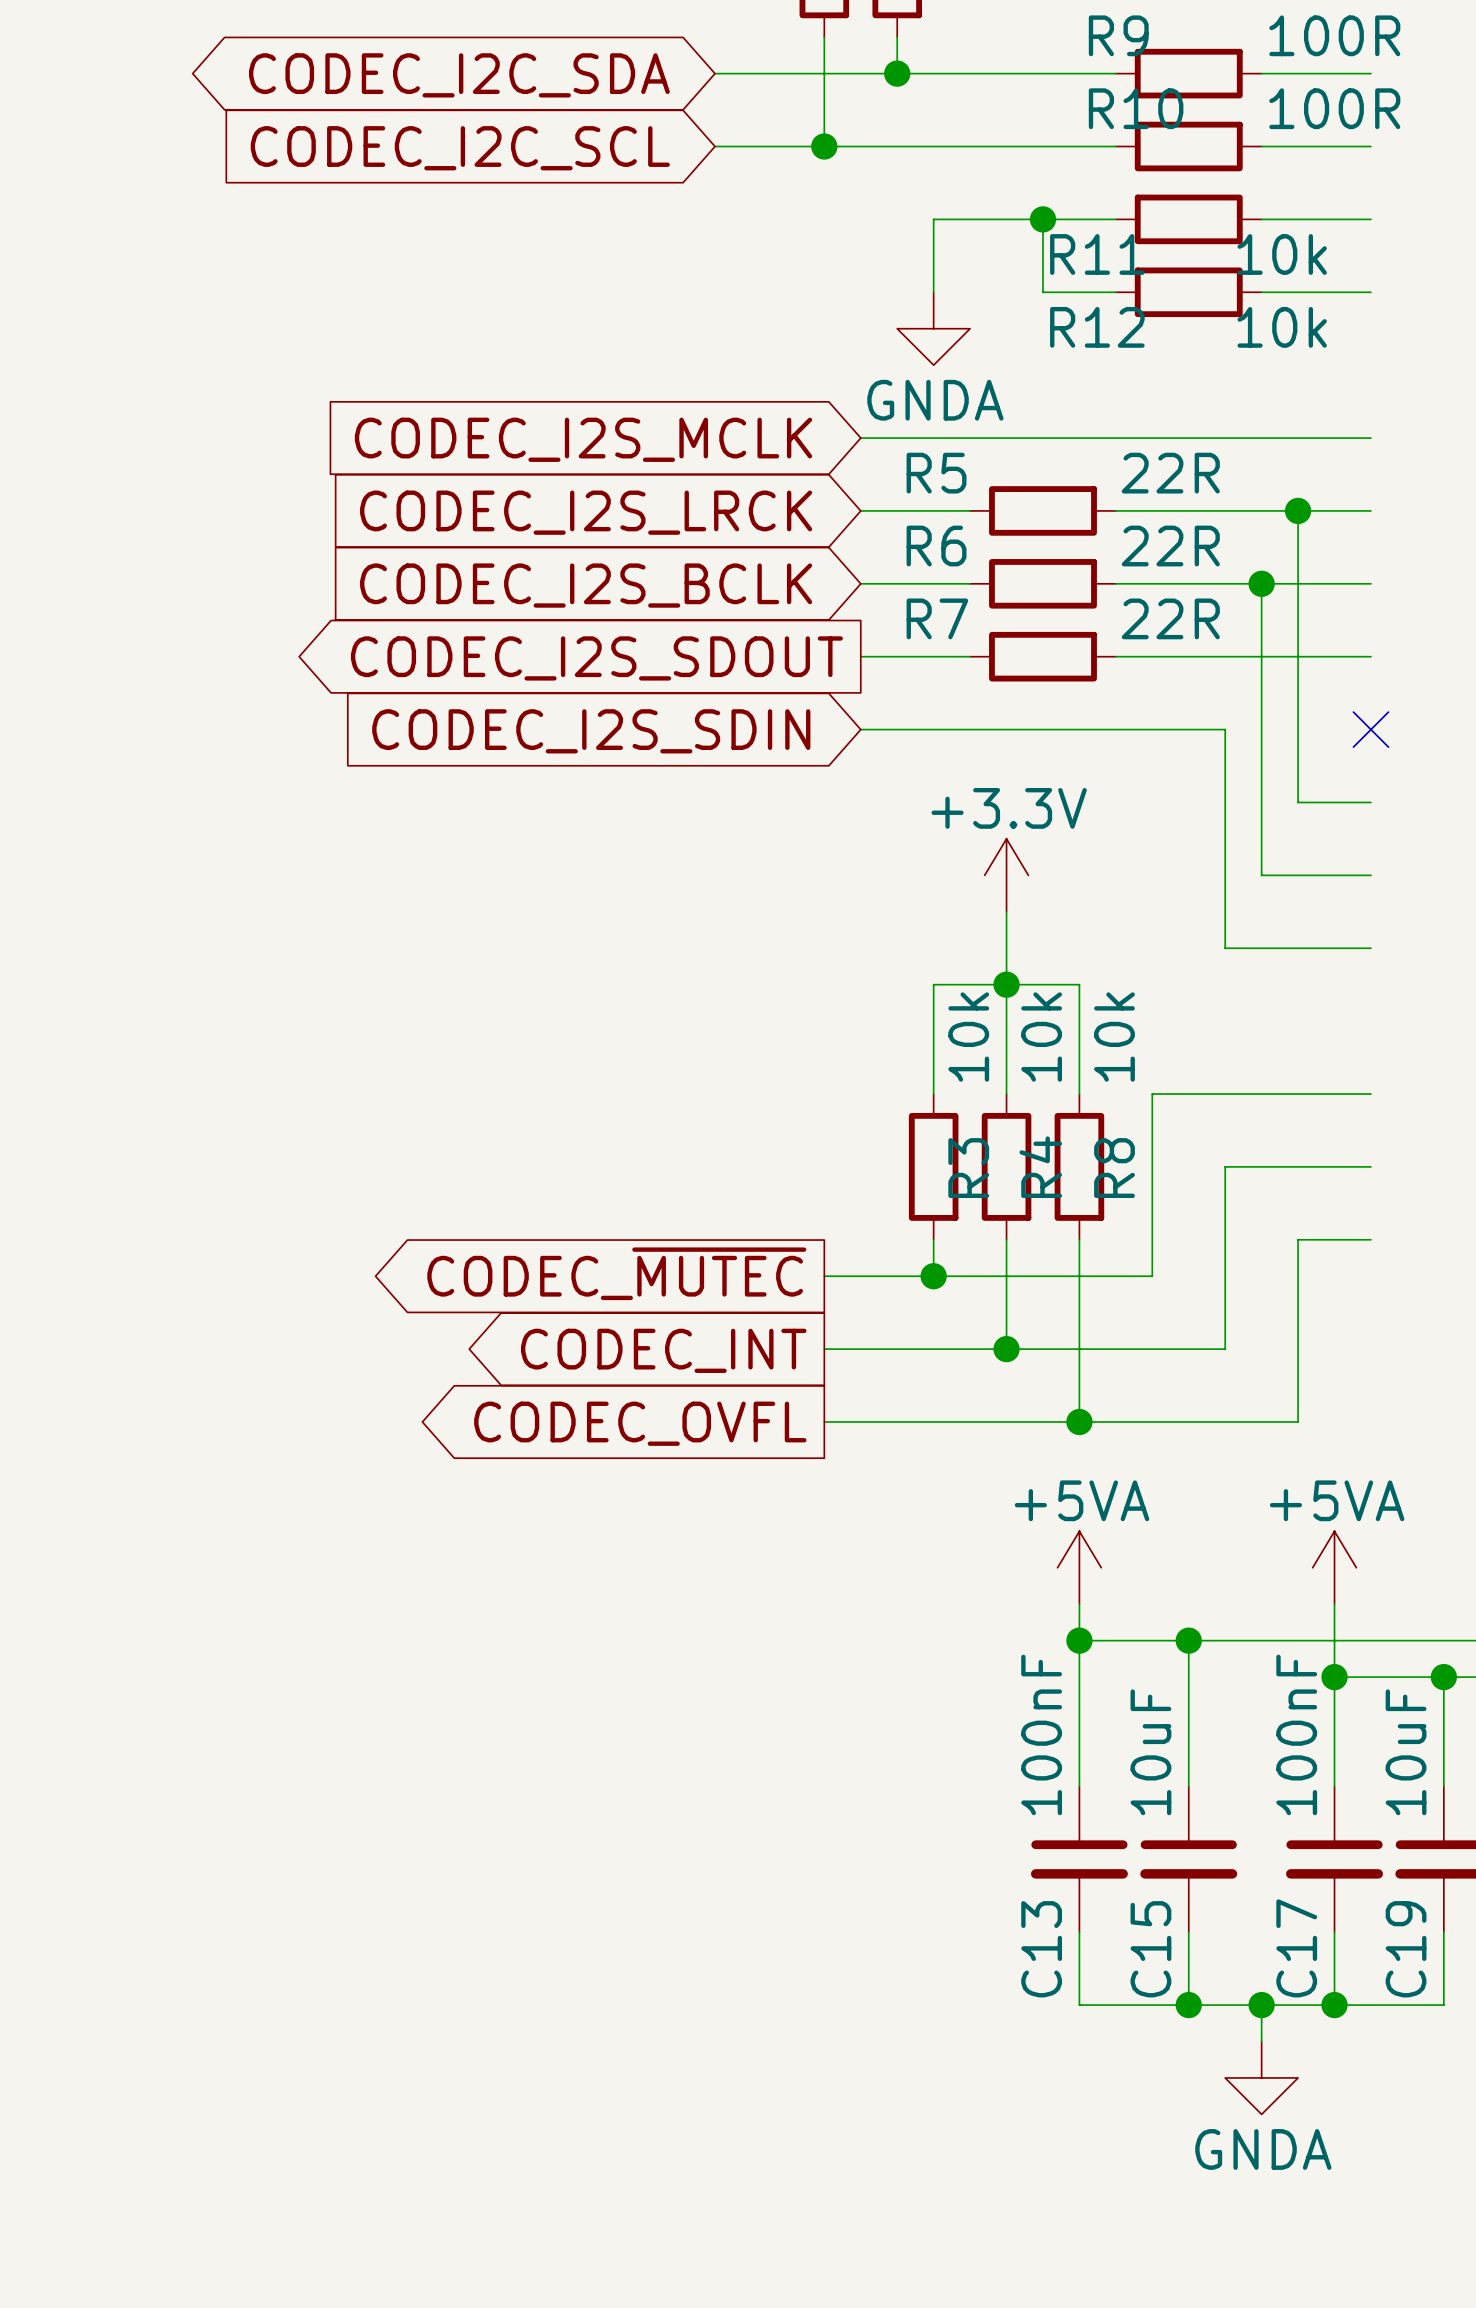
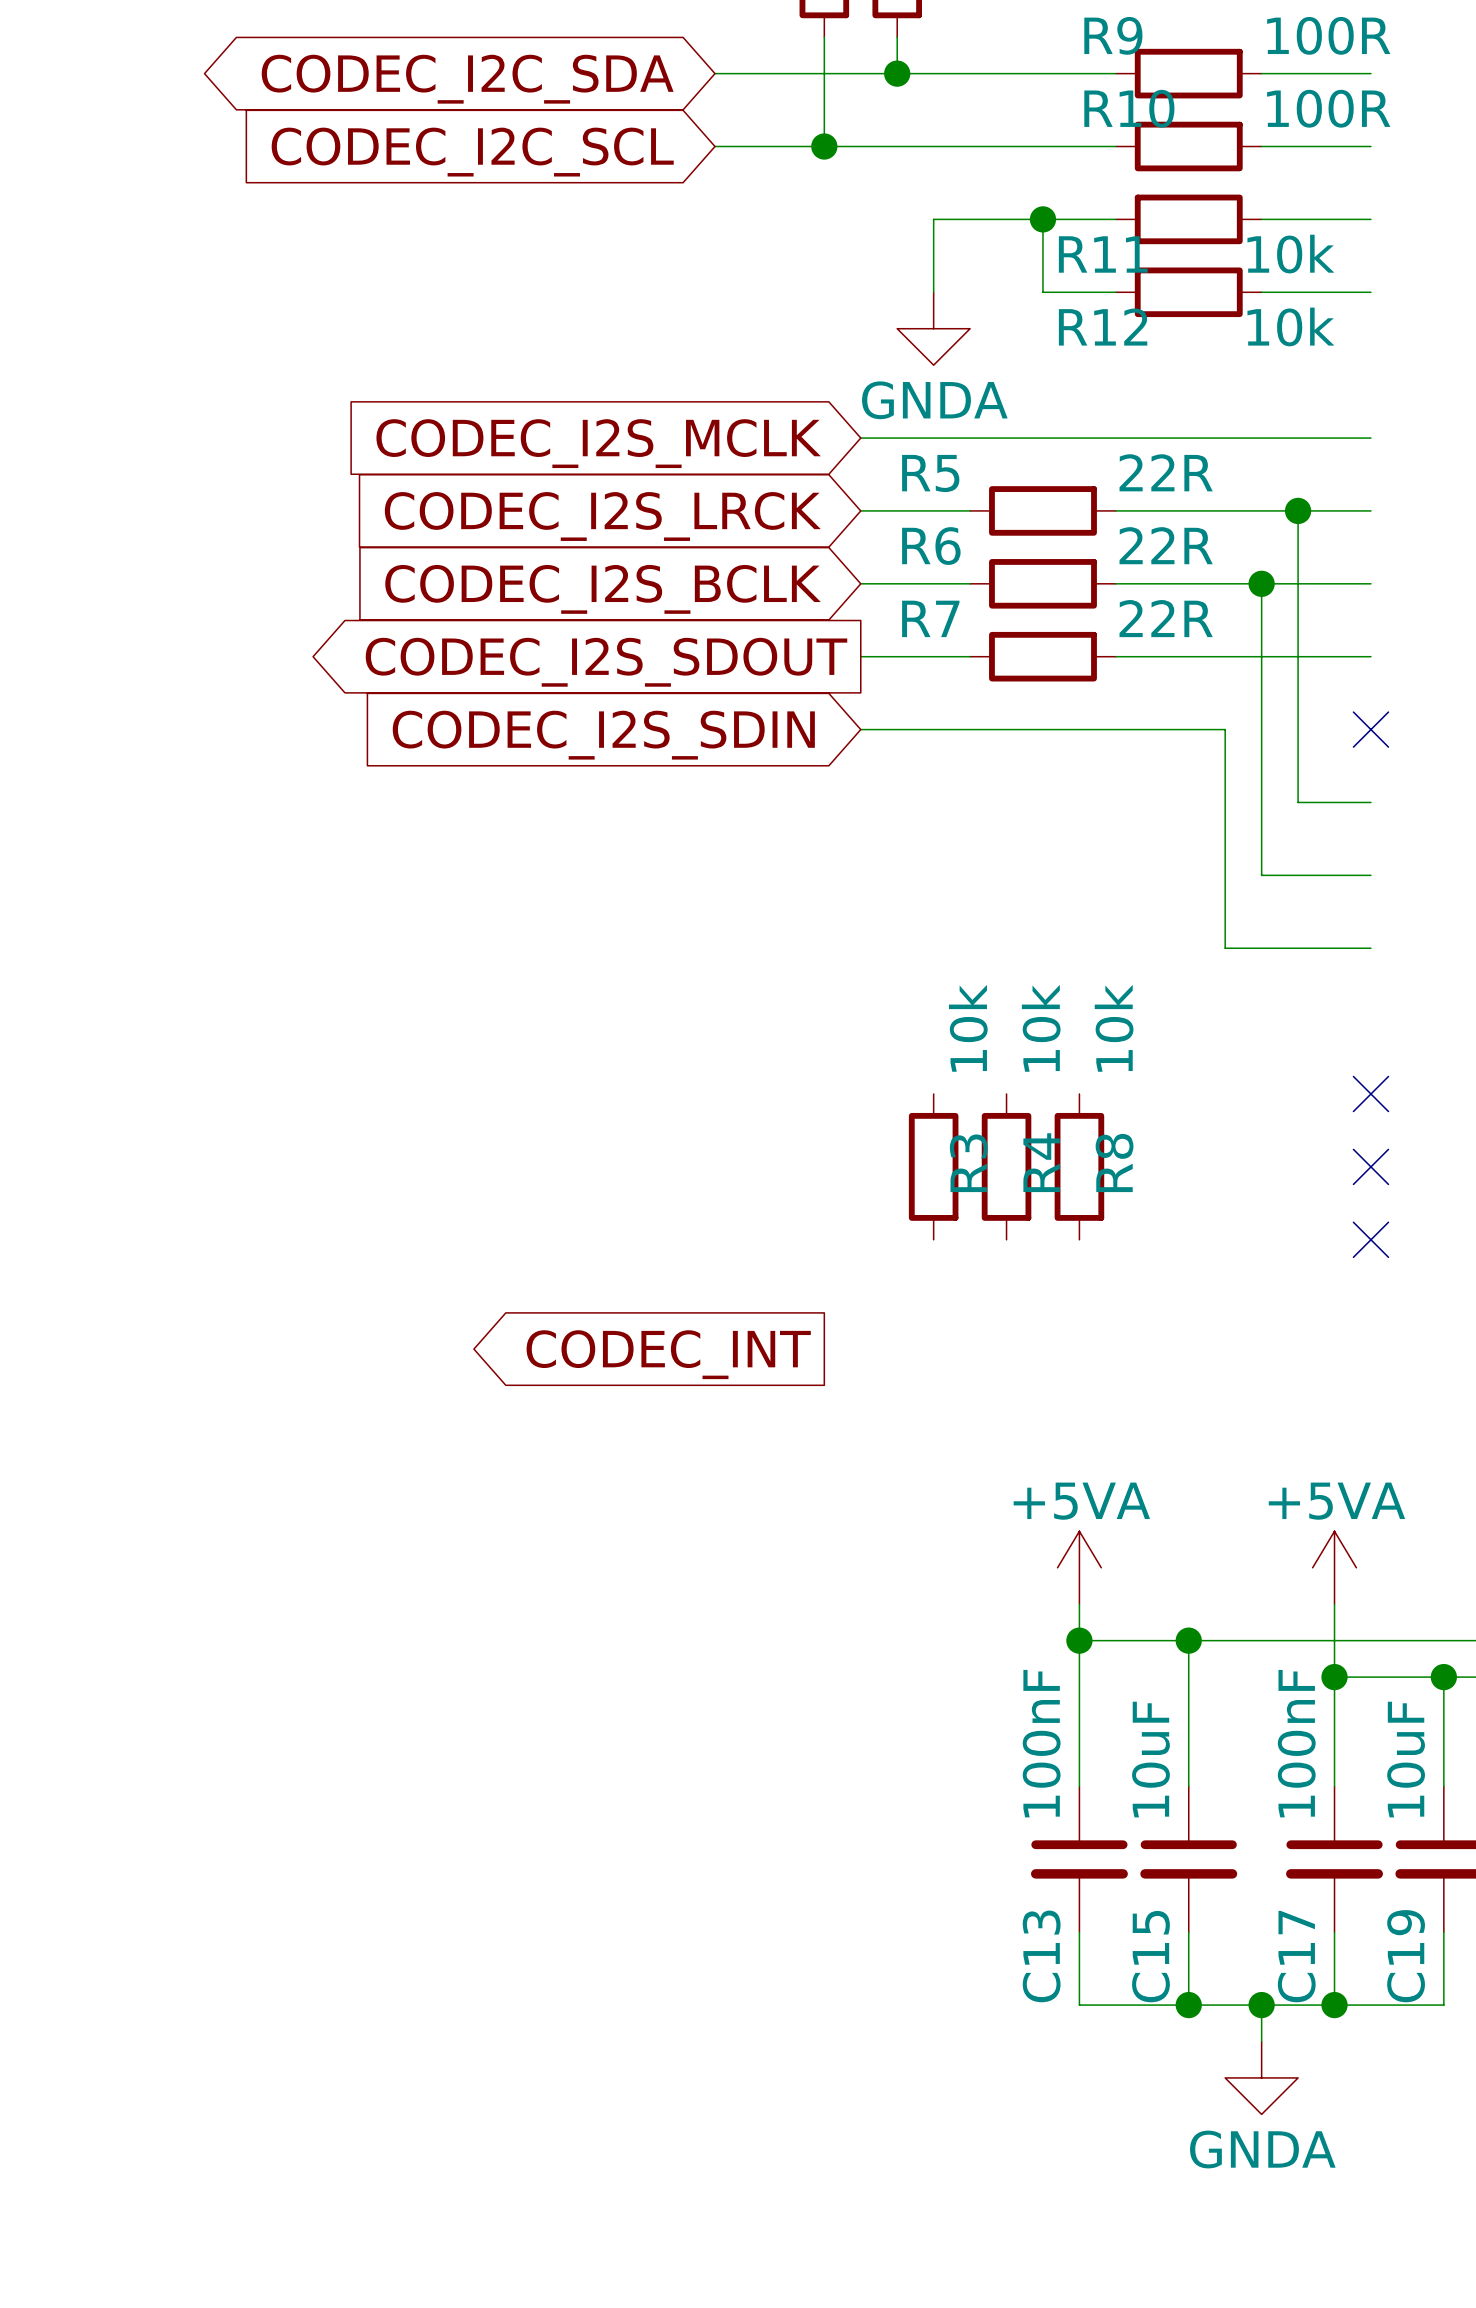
power symbol: +3.3V (1006, 875) -> none
wire: (1006, 911) (1006, 1094) -> none
junction: (1006, 984) -> none
wire: (933, 1094) (933, 984) (1079, 984) (1079, 1094) -> none
wire: (1370, 1094) (1152, 1094) (1152, 1276) (824, 1276) -> none
no-connect mark: none -> (1370, 1094)
wire: (1370, 1166) (1225, 1166) (1225, 1349) (824, 1349) -> none
no-connect mark: none -> (1370, 1166)
wire: (933, 1239) (933, 1276) -> none
wire: (1006, 1239) (1006, 1349) -> none
wire: (1079, 1239) (1079, 1421) -> none
wire: (1370, 1239) (1298, 1239) (1298, 1421) (824, 1421) -> none
no-connect mark: none -> (1370, 1239)
global label: CODEC_~{MUTEC} (616, 1273) -> none
junction: (933, 1276) -> none
junction: (1006, 1349) -> none
junction: (1079, 1421) -> none
global label: CODEC_OVFL (640, 1423) -> none

